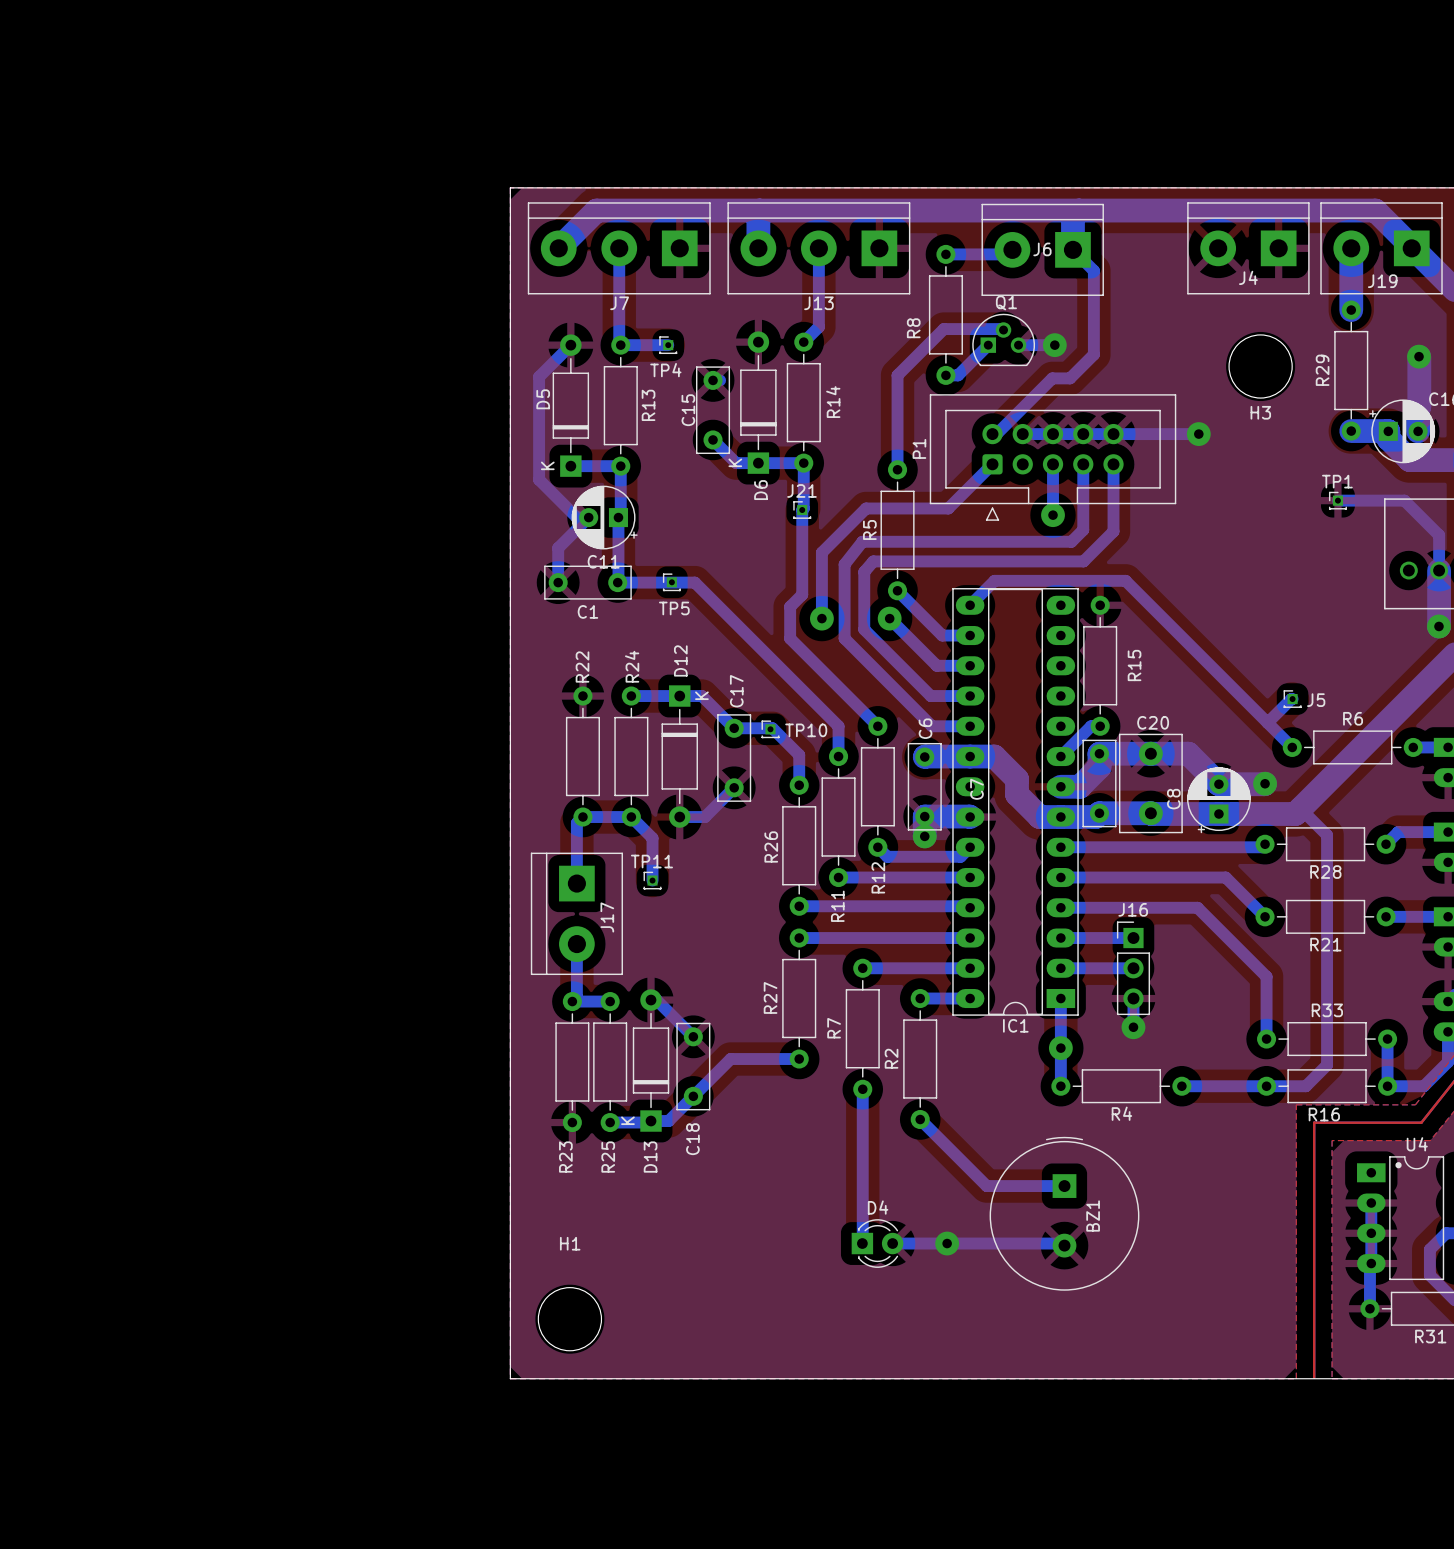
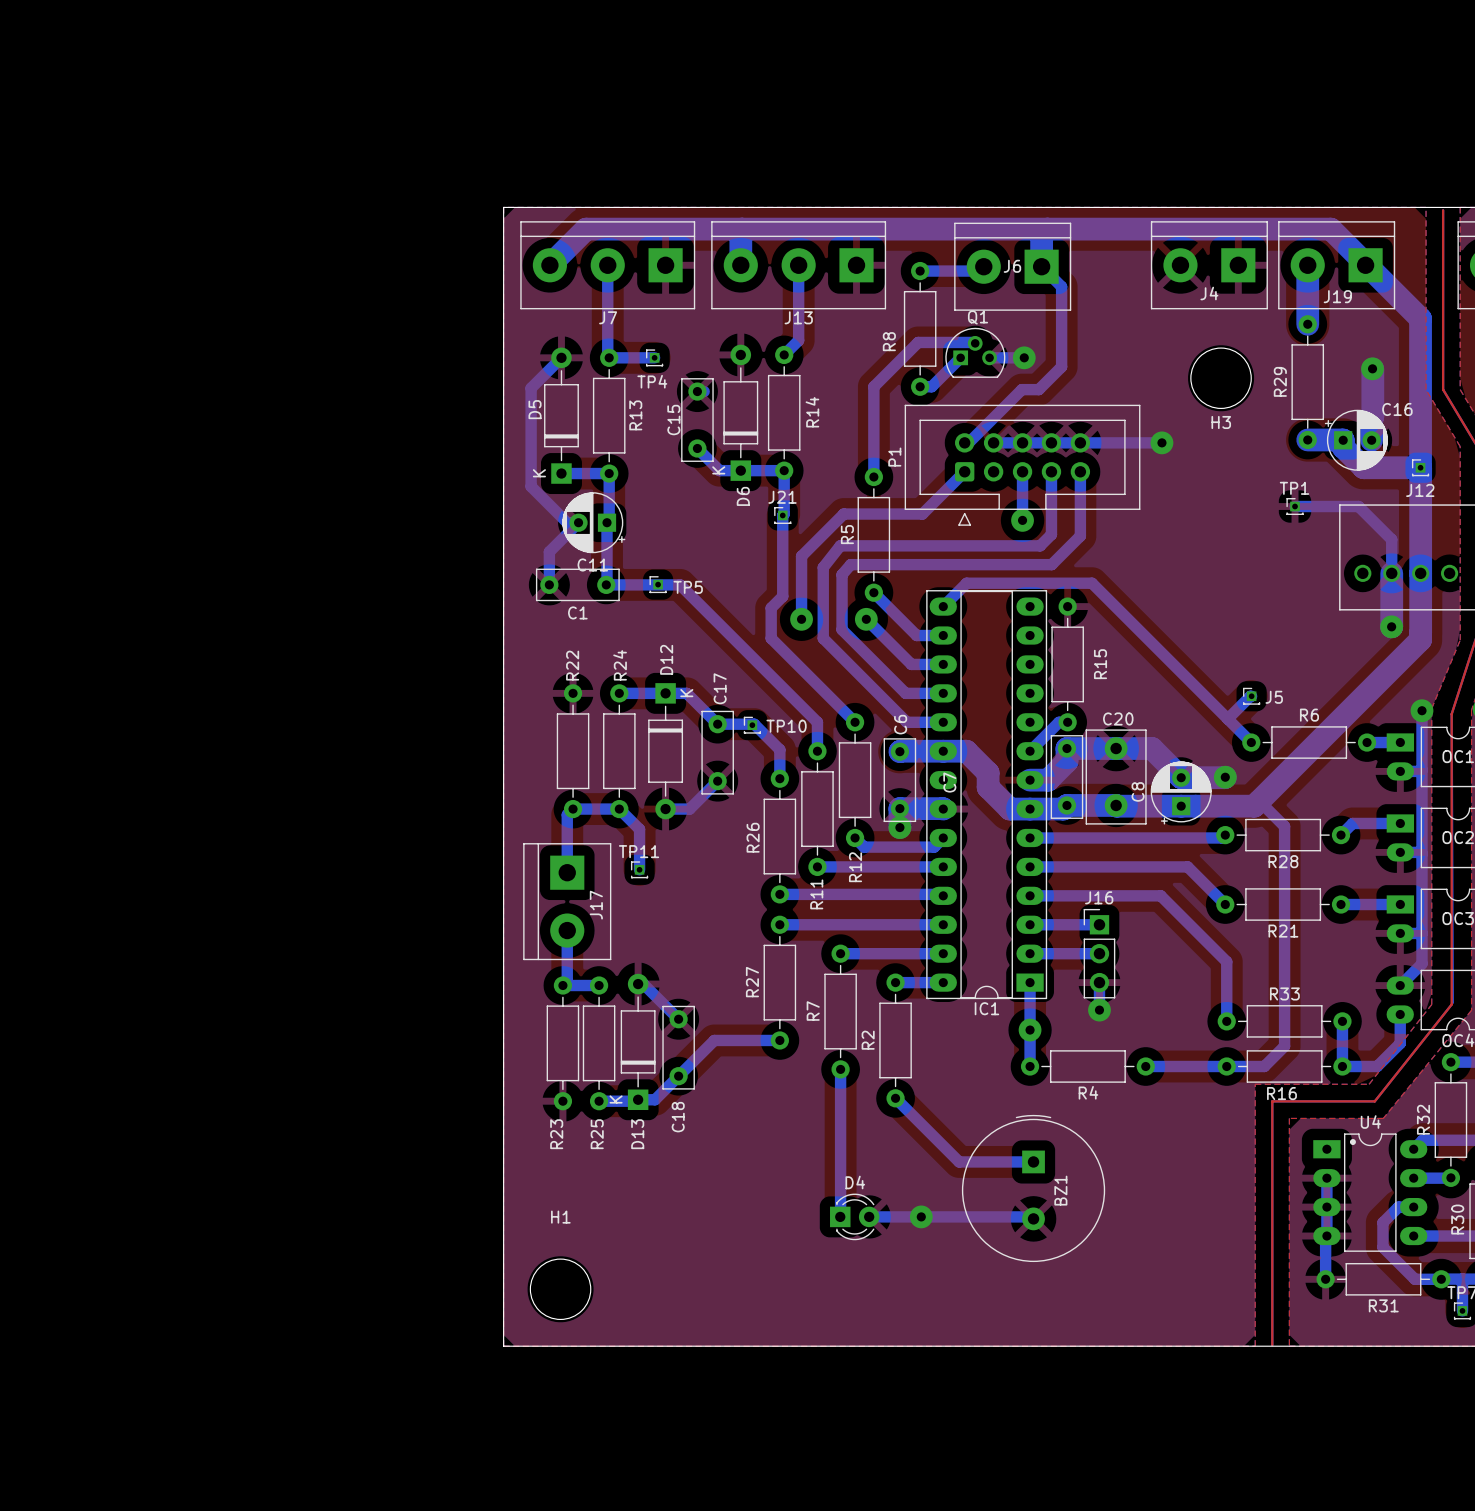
TP5 name position: TP5 (674, 608) -> TP5 (688, 587)

